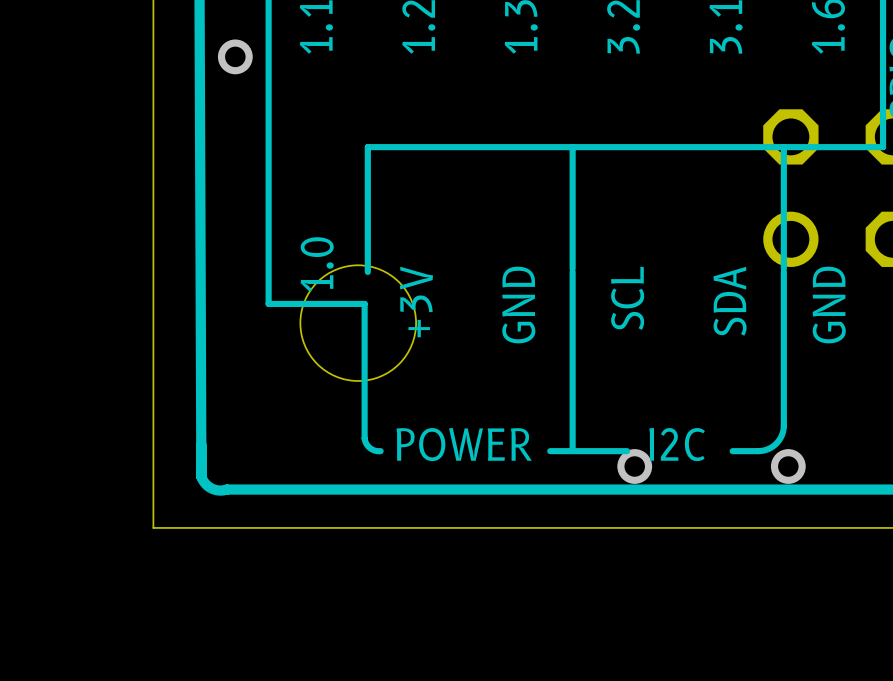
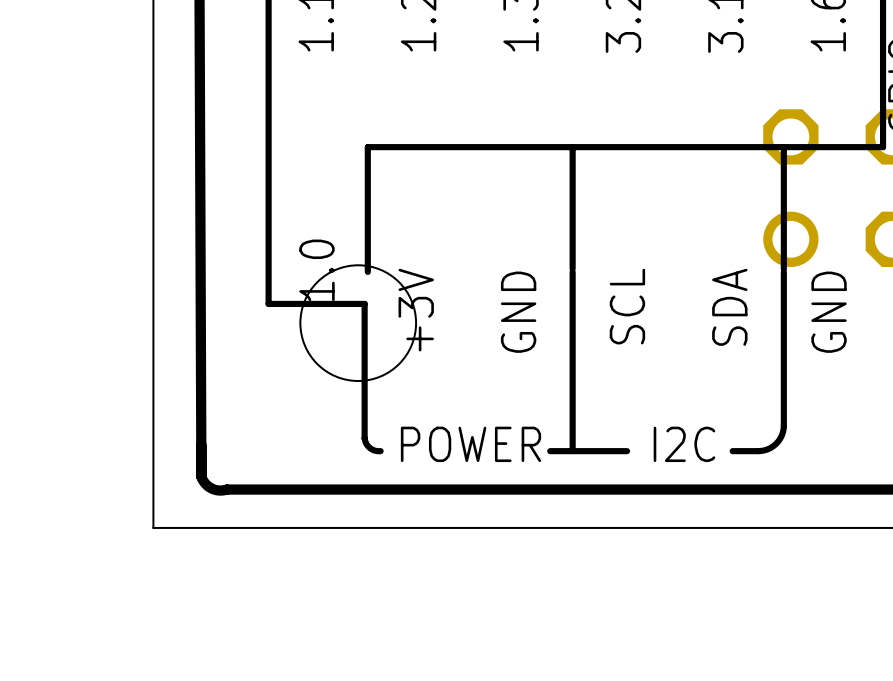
via: (235, 56) -> none
via: (634, 466) -> none
via: (788, 466) -> none

